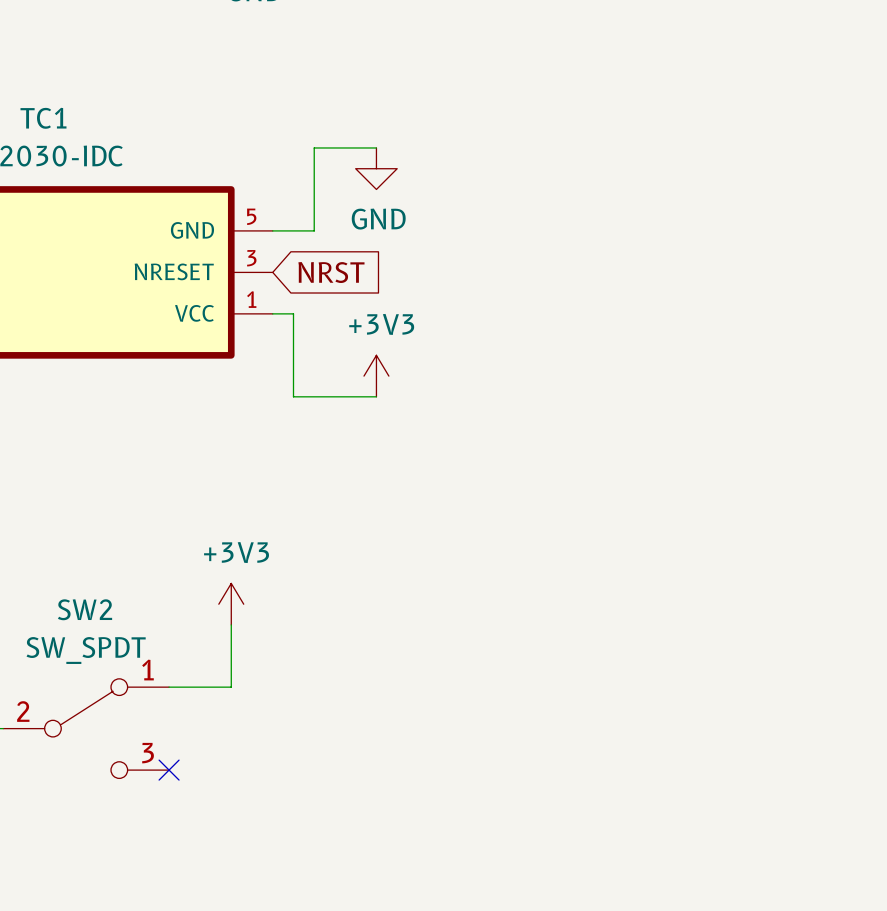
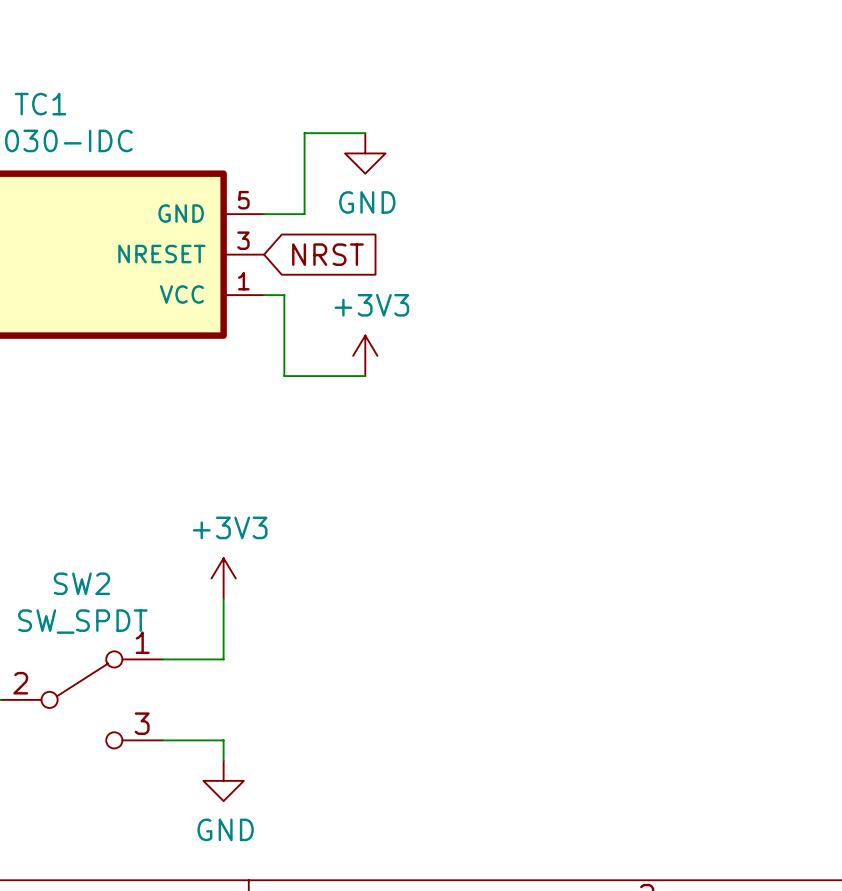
wire: none -> (162, 740) (223, 740) (223, 760)
no-connect mark: (169, 770) -> none
power symbol: none -> GND (223, 780)

